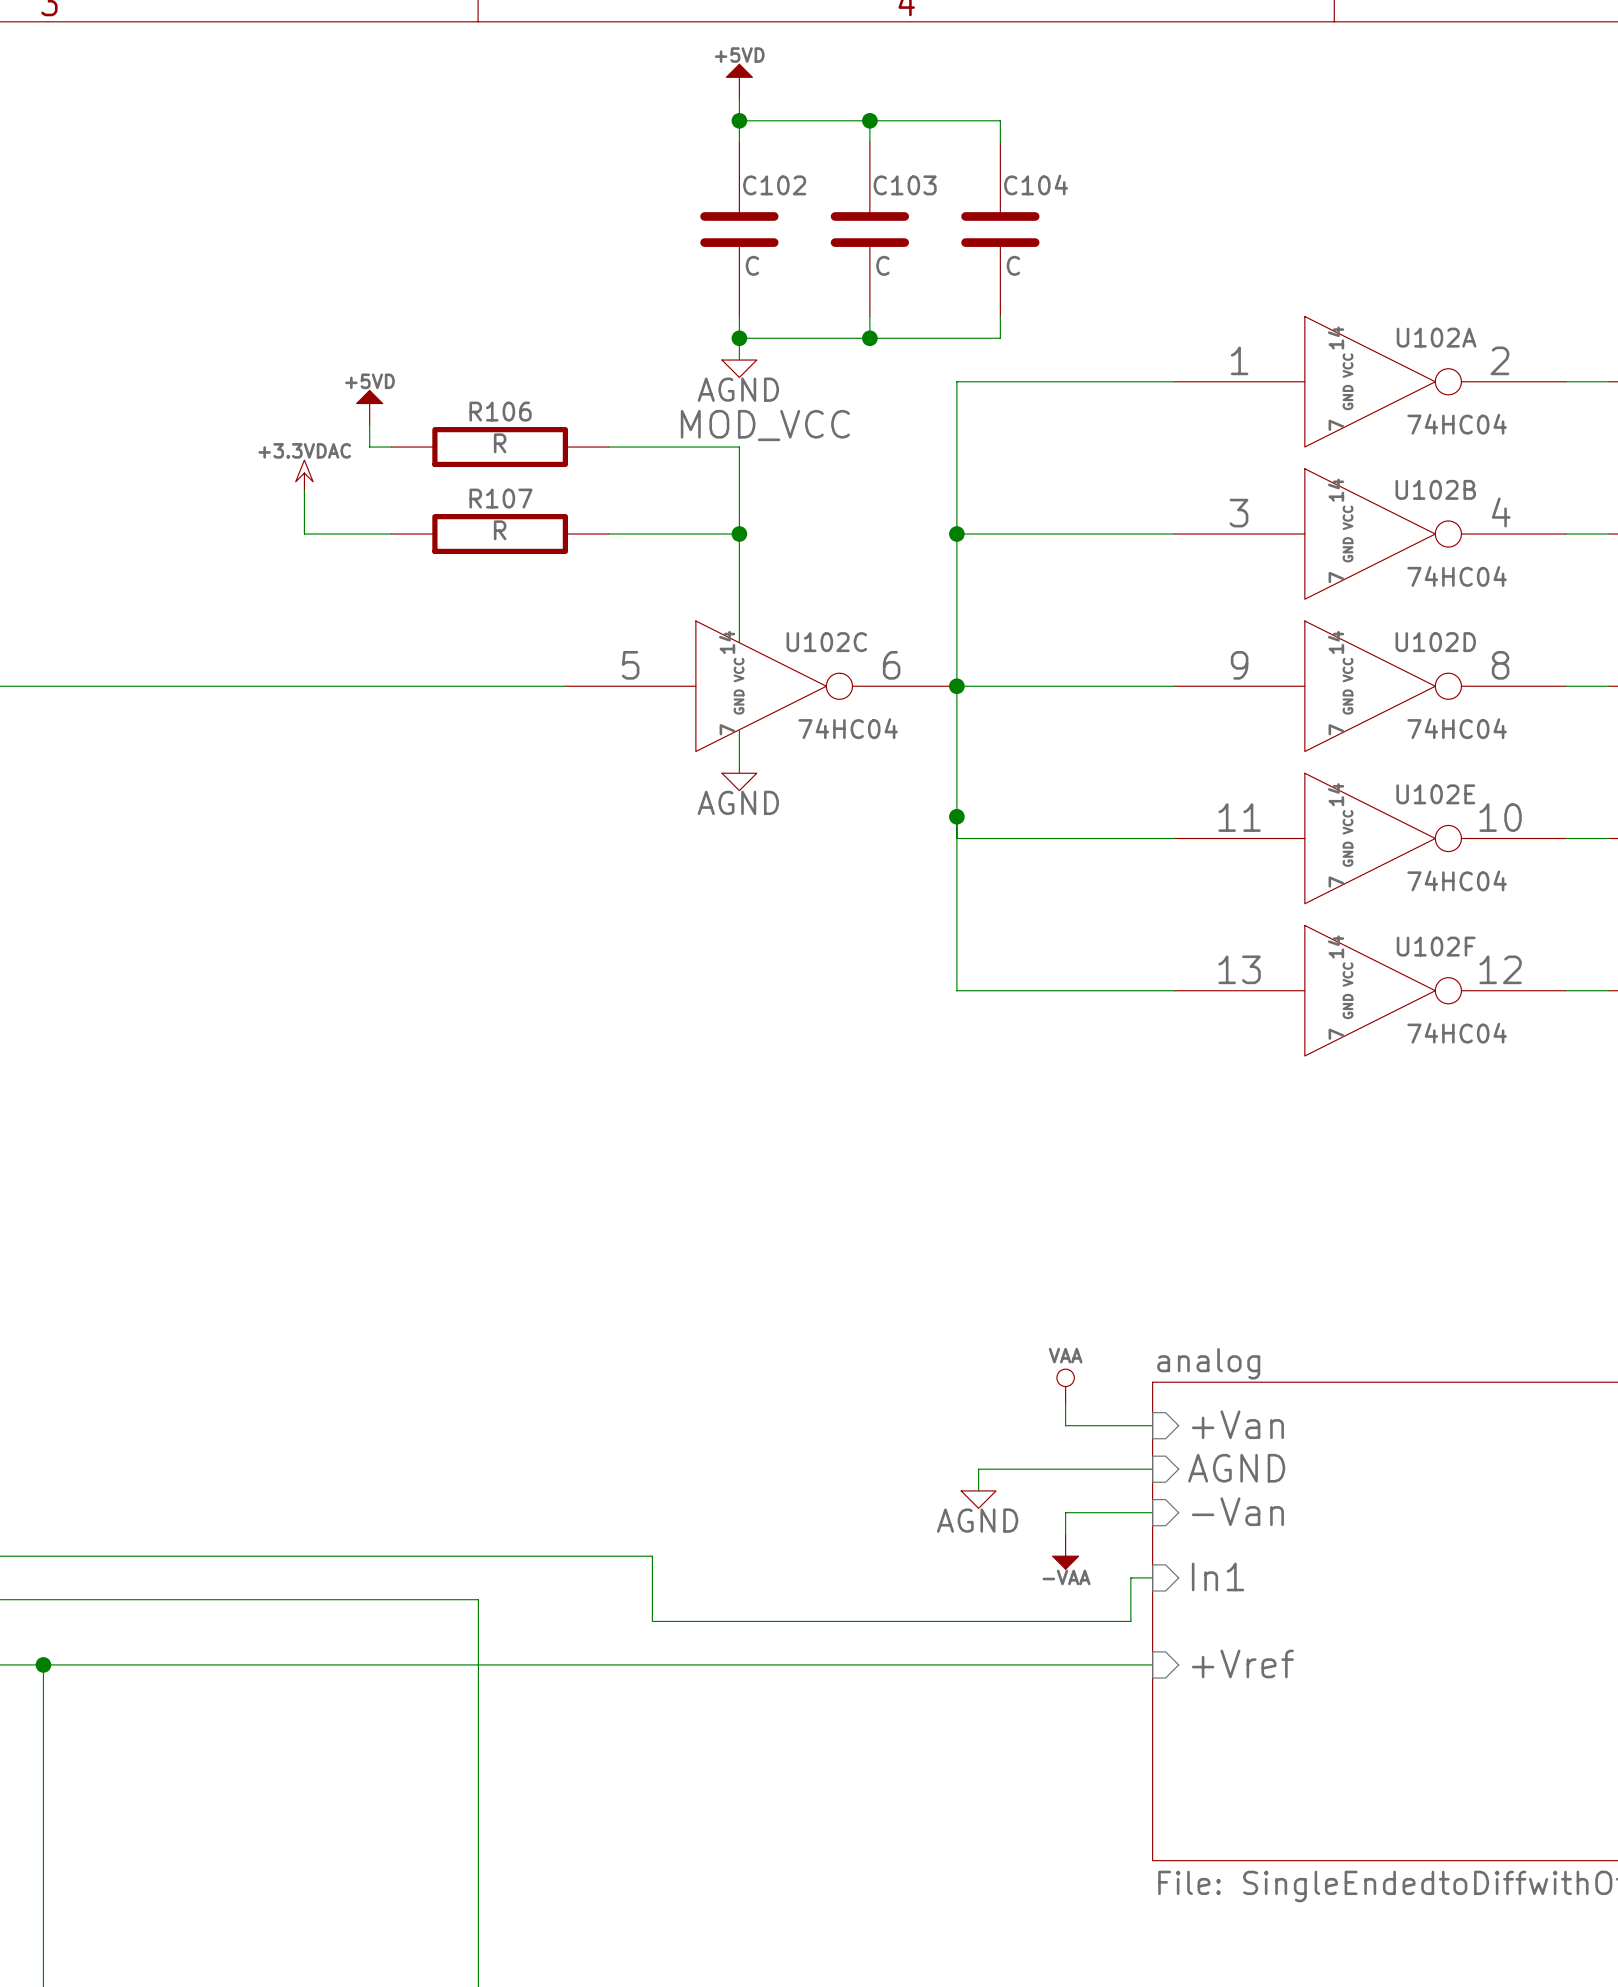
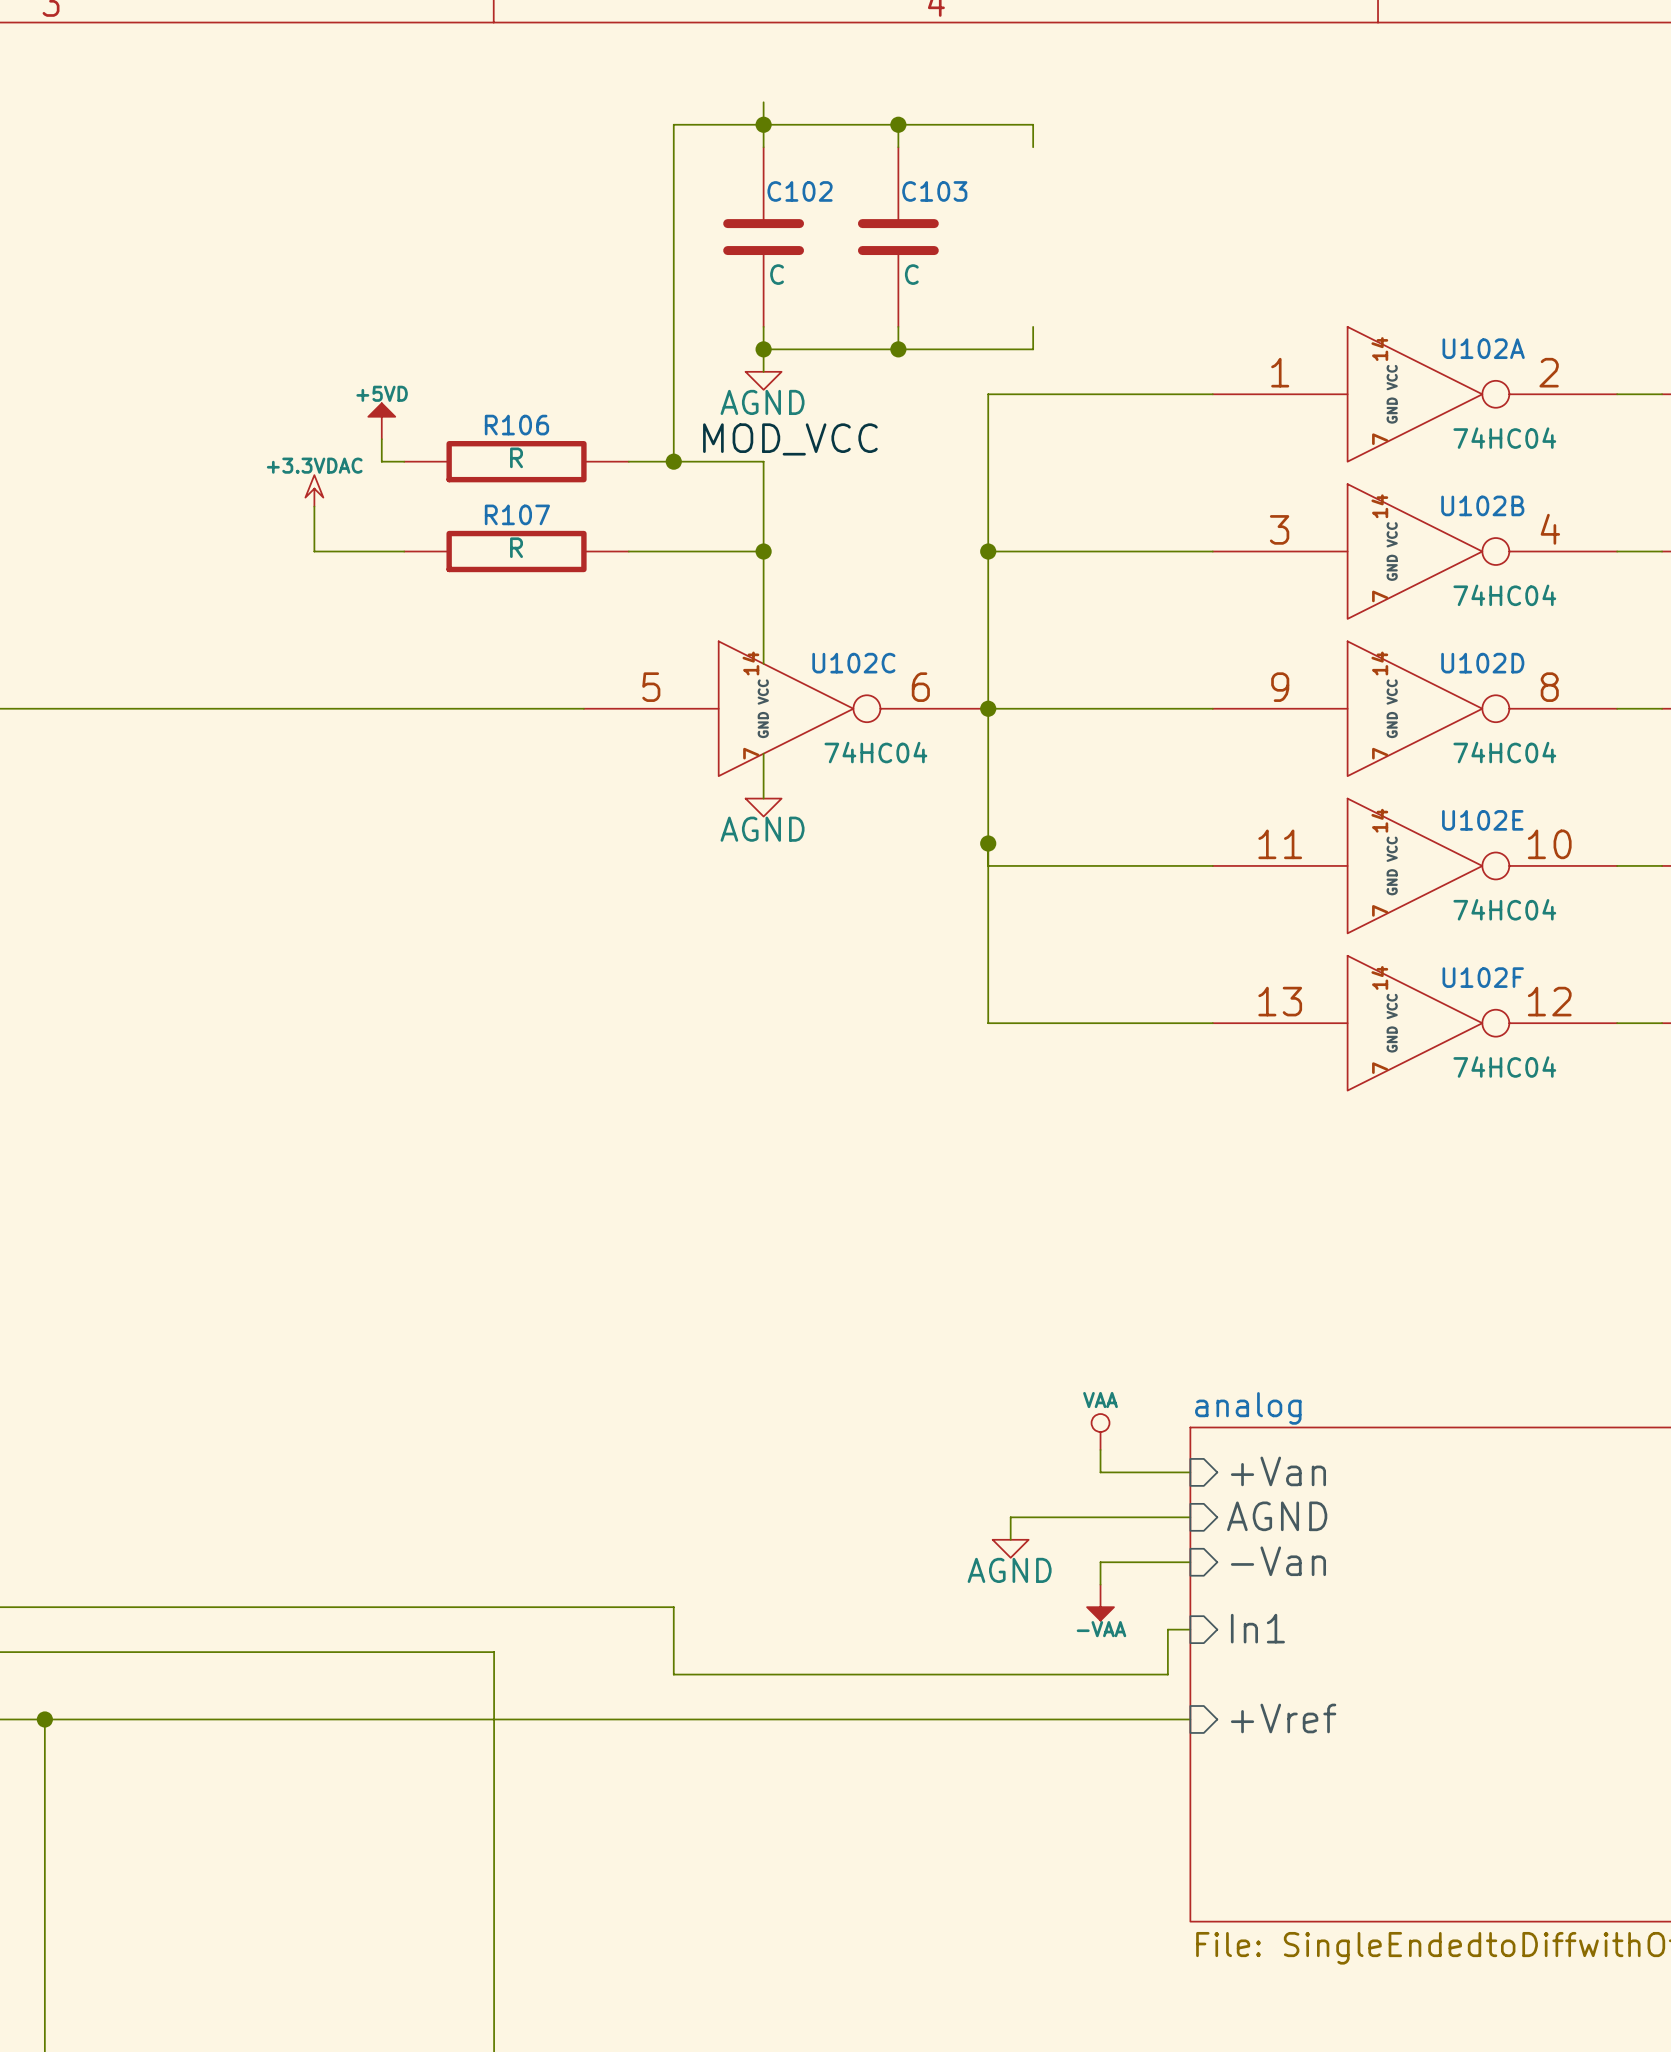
power symbol: +5VD (739, 81) -> none
wire: none -> (763, 124) (673, 124) (673, 461)
C104: C (1000, 229) -> none
junction: none -> (673, 461)

